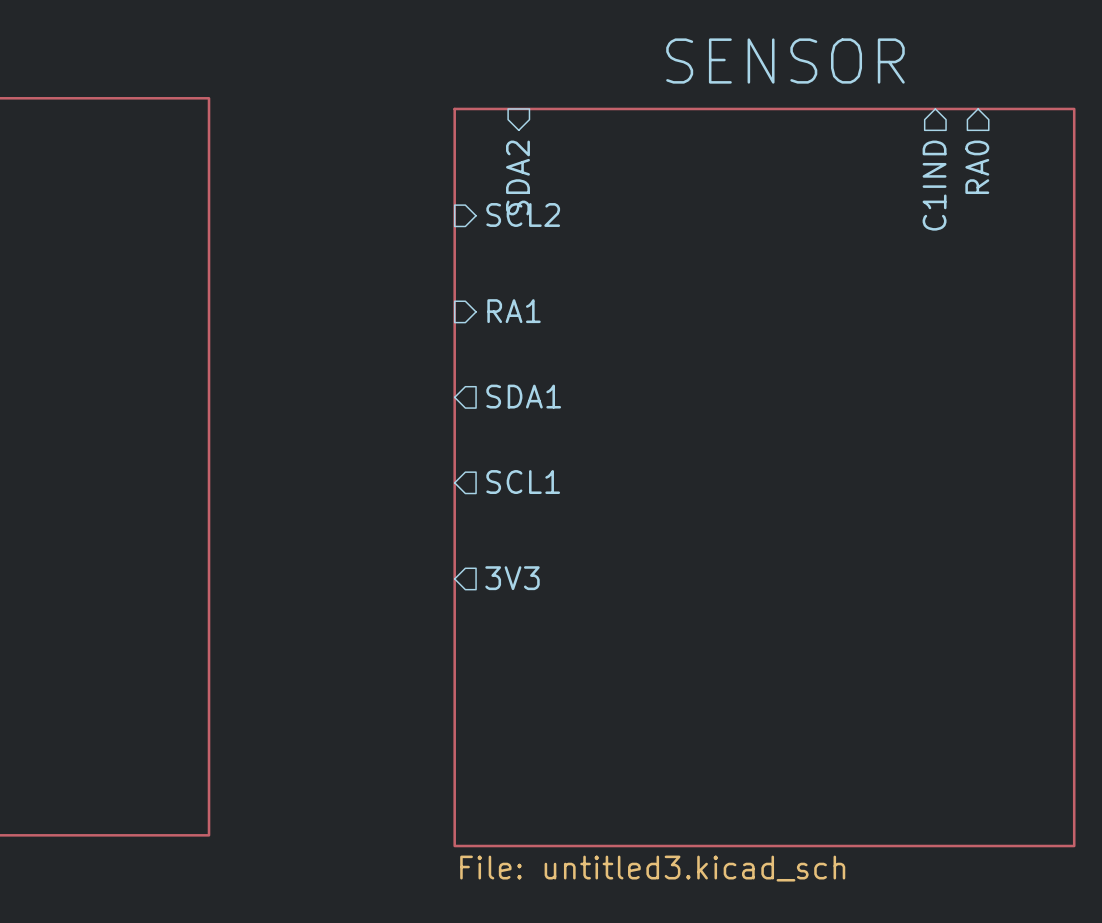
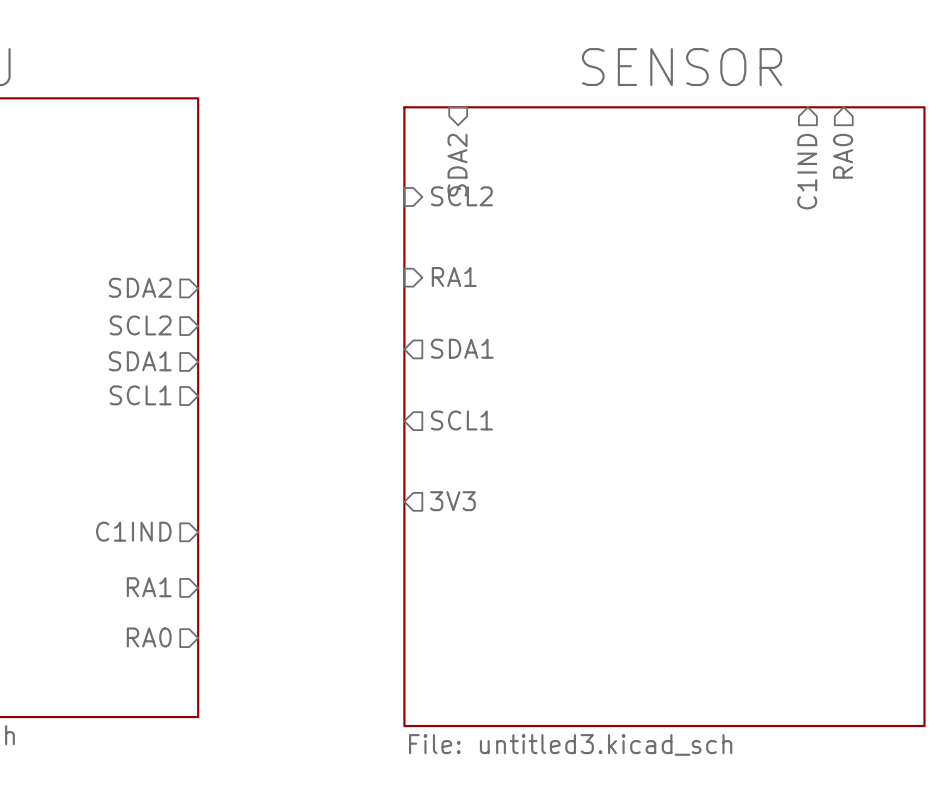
sheet pin: none -> SDA2 (140, 287)
sheet pin: none -> SCL2 (140, 325)
sheet pin: none -> SDA1 (140, 361)
sheet pin: none -> SCL1 (140, 395)
sheet pin: none -> C1IND (133, 531)
sheet pin: none -> RA1 (149, 587)
sheet pin: none -> RA0 (149, 637)

